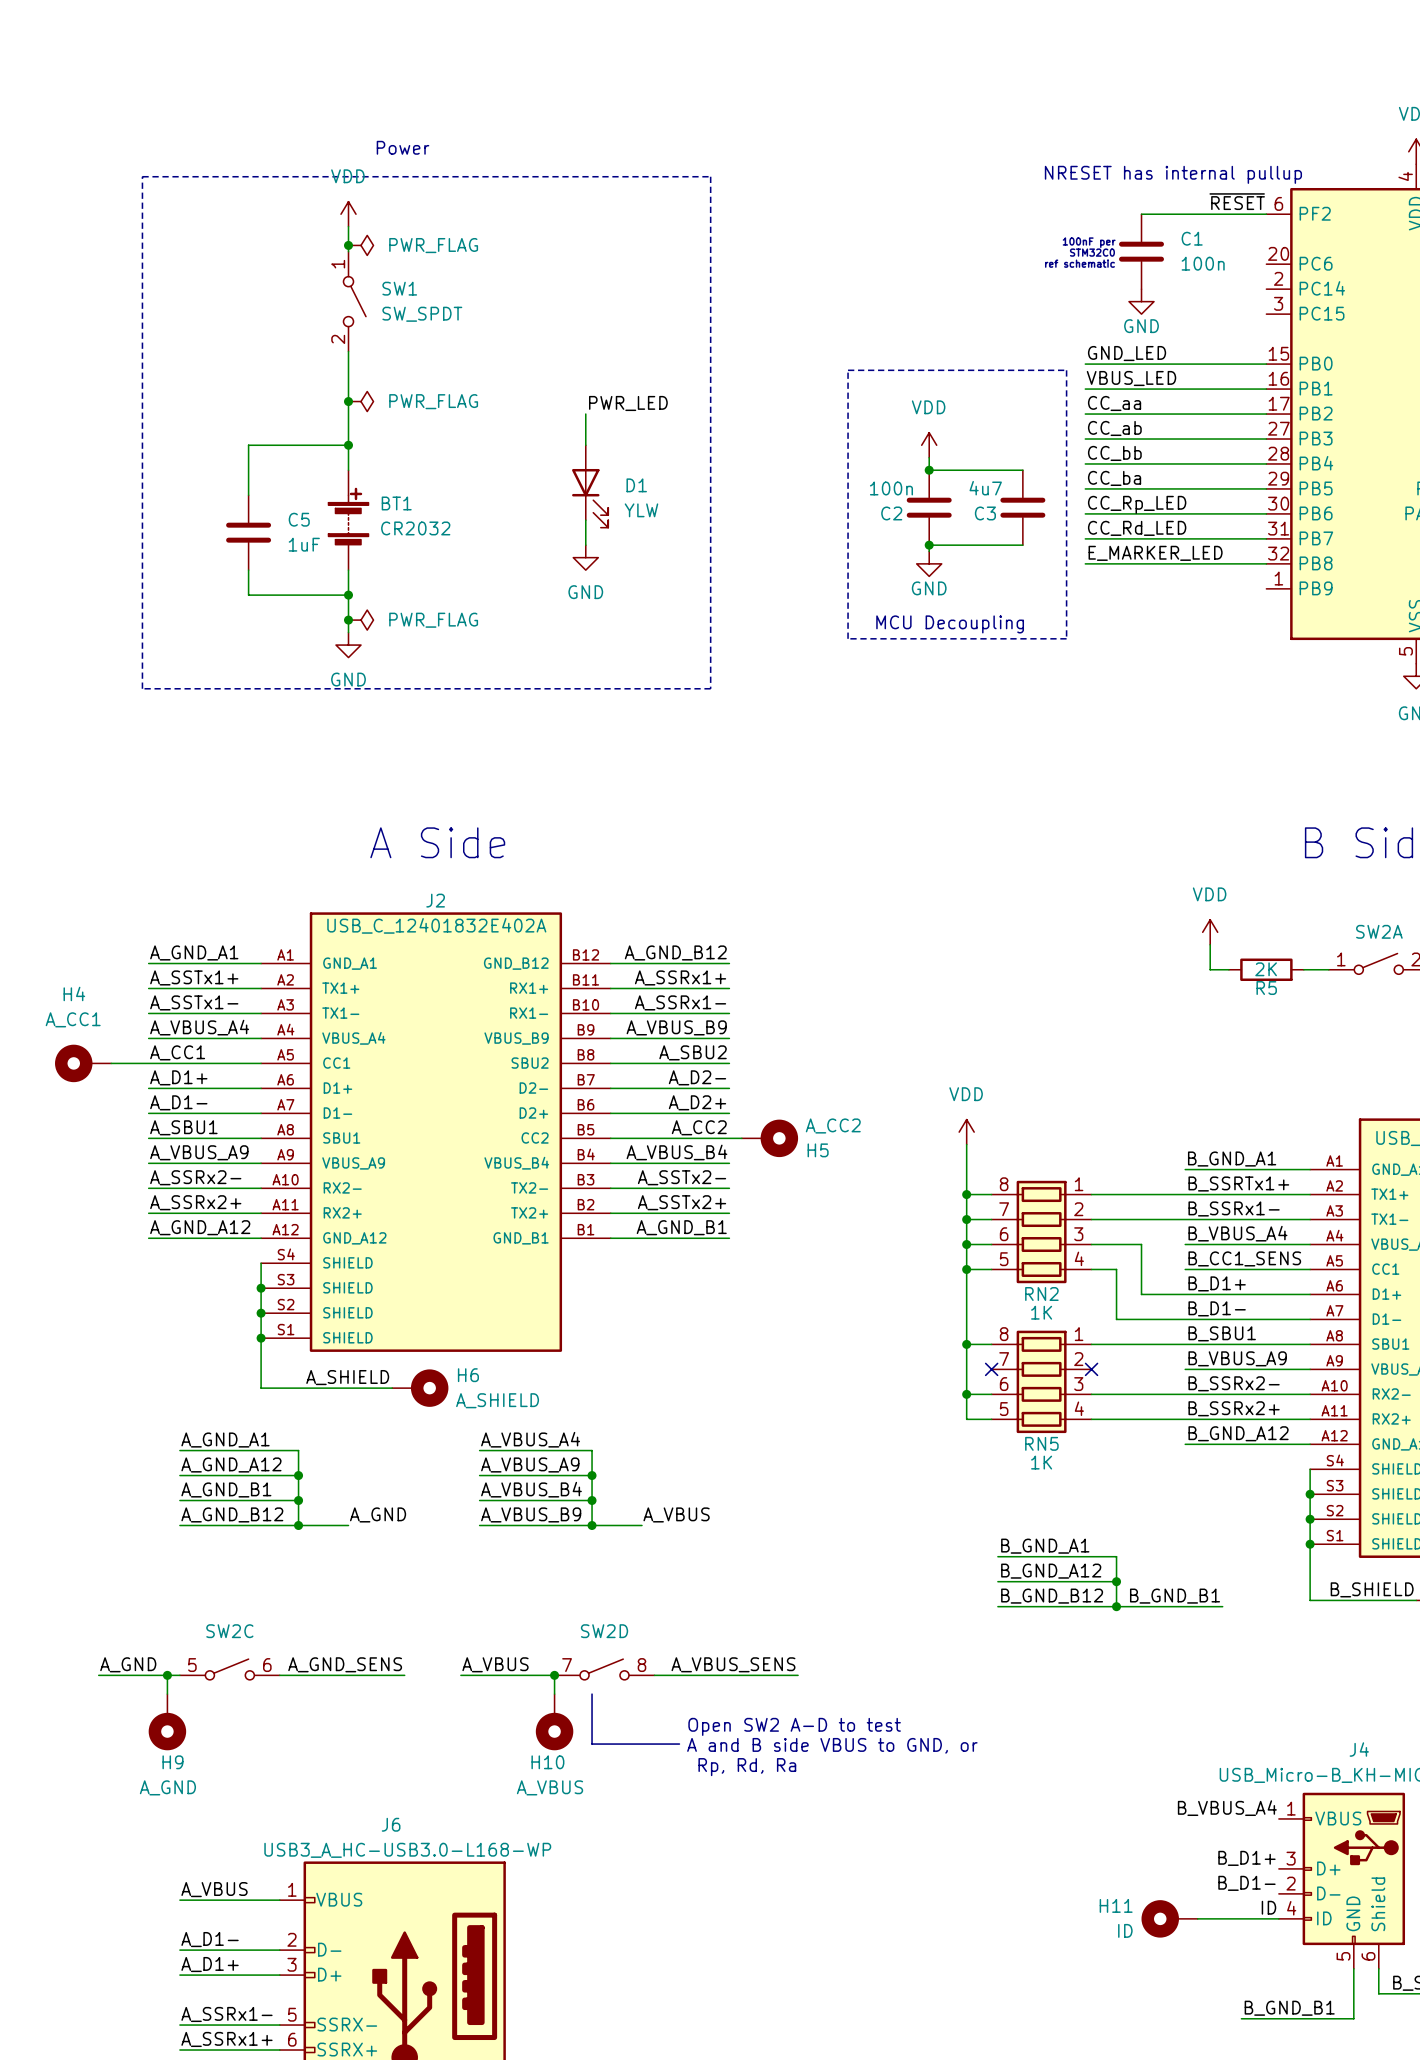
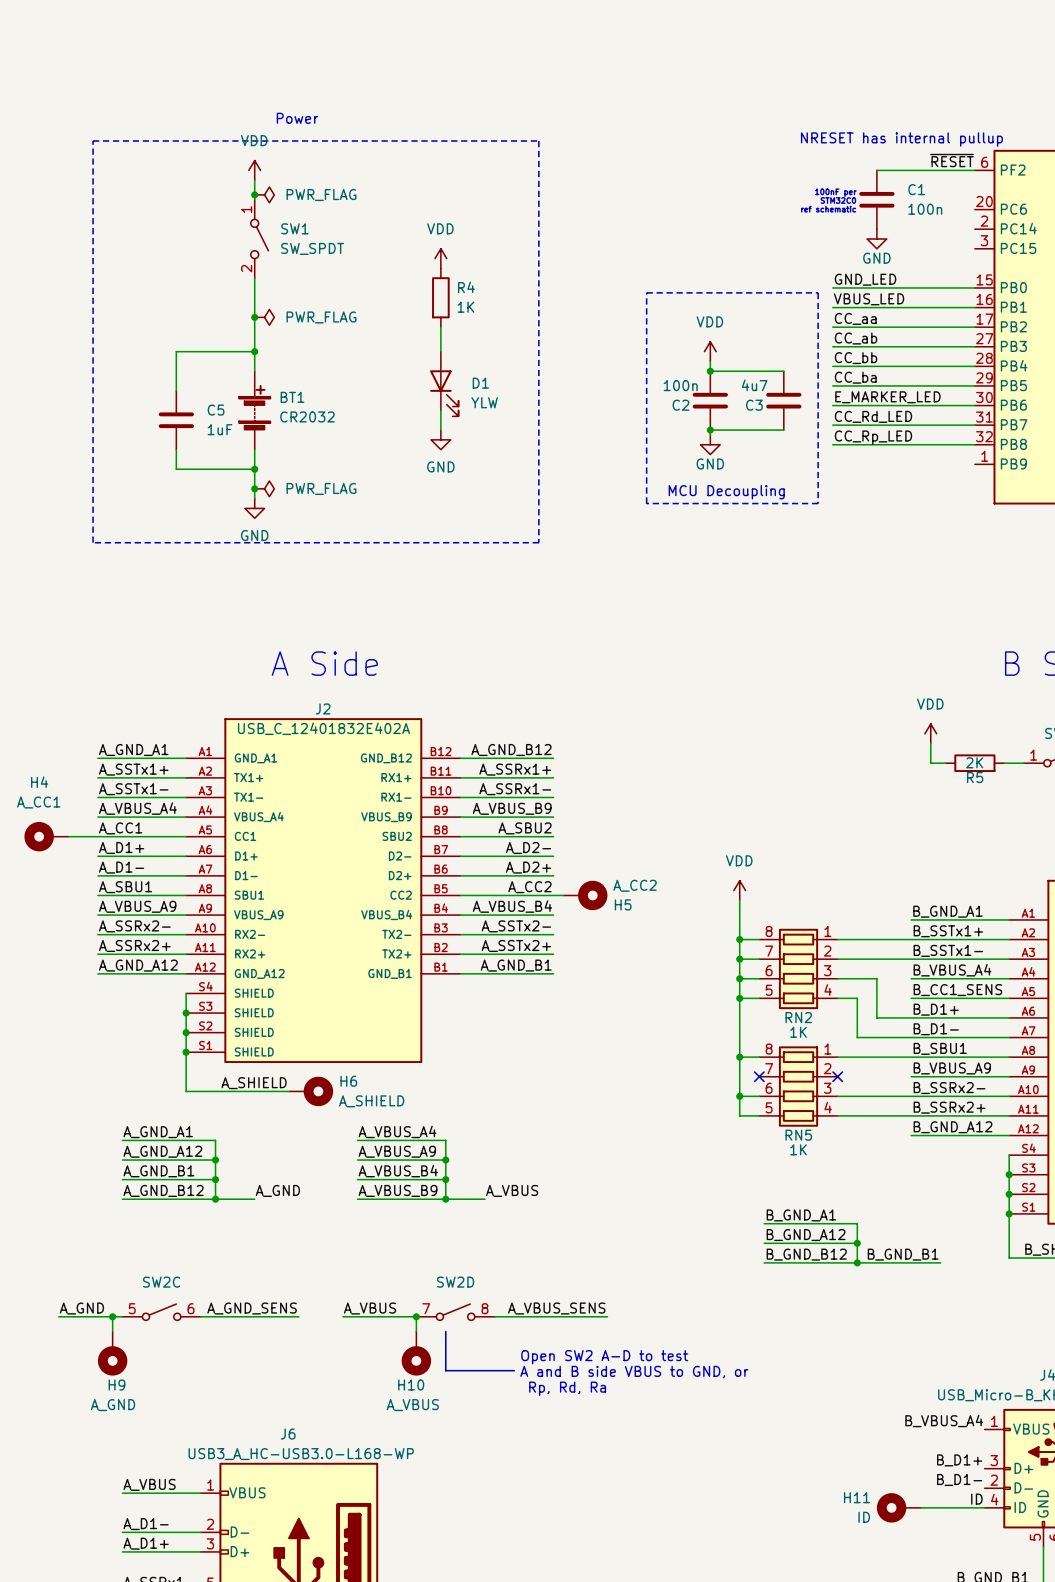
power symbol: none -> VDD (440, 258)
R4: none -> 1K (440, 297)
label: PWR_LED (628, 403) -> none
label: CC_Rp_LED (1137, 504) -> E_MARKER_LED (887, 397)
label: E_MARKER_LED (1155, 553) -> CC_Rp_LED (873, 437)
label: B_SSRTx1+ (1238, 1184) -> B_SSTx1+ (948, 931)
label: B_SSRx1- (1234, 1208) -> B_SSTx1- (948, 950)

